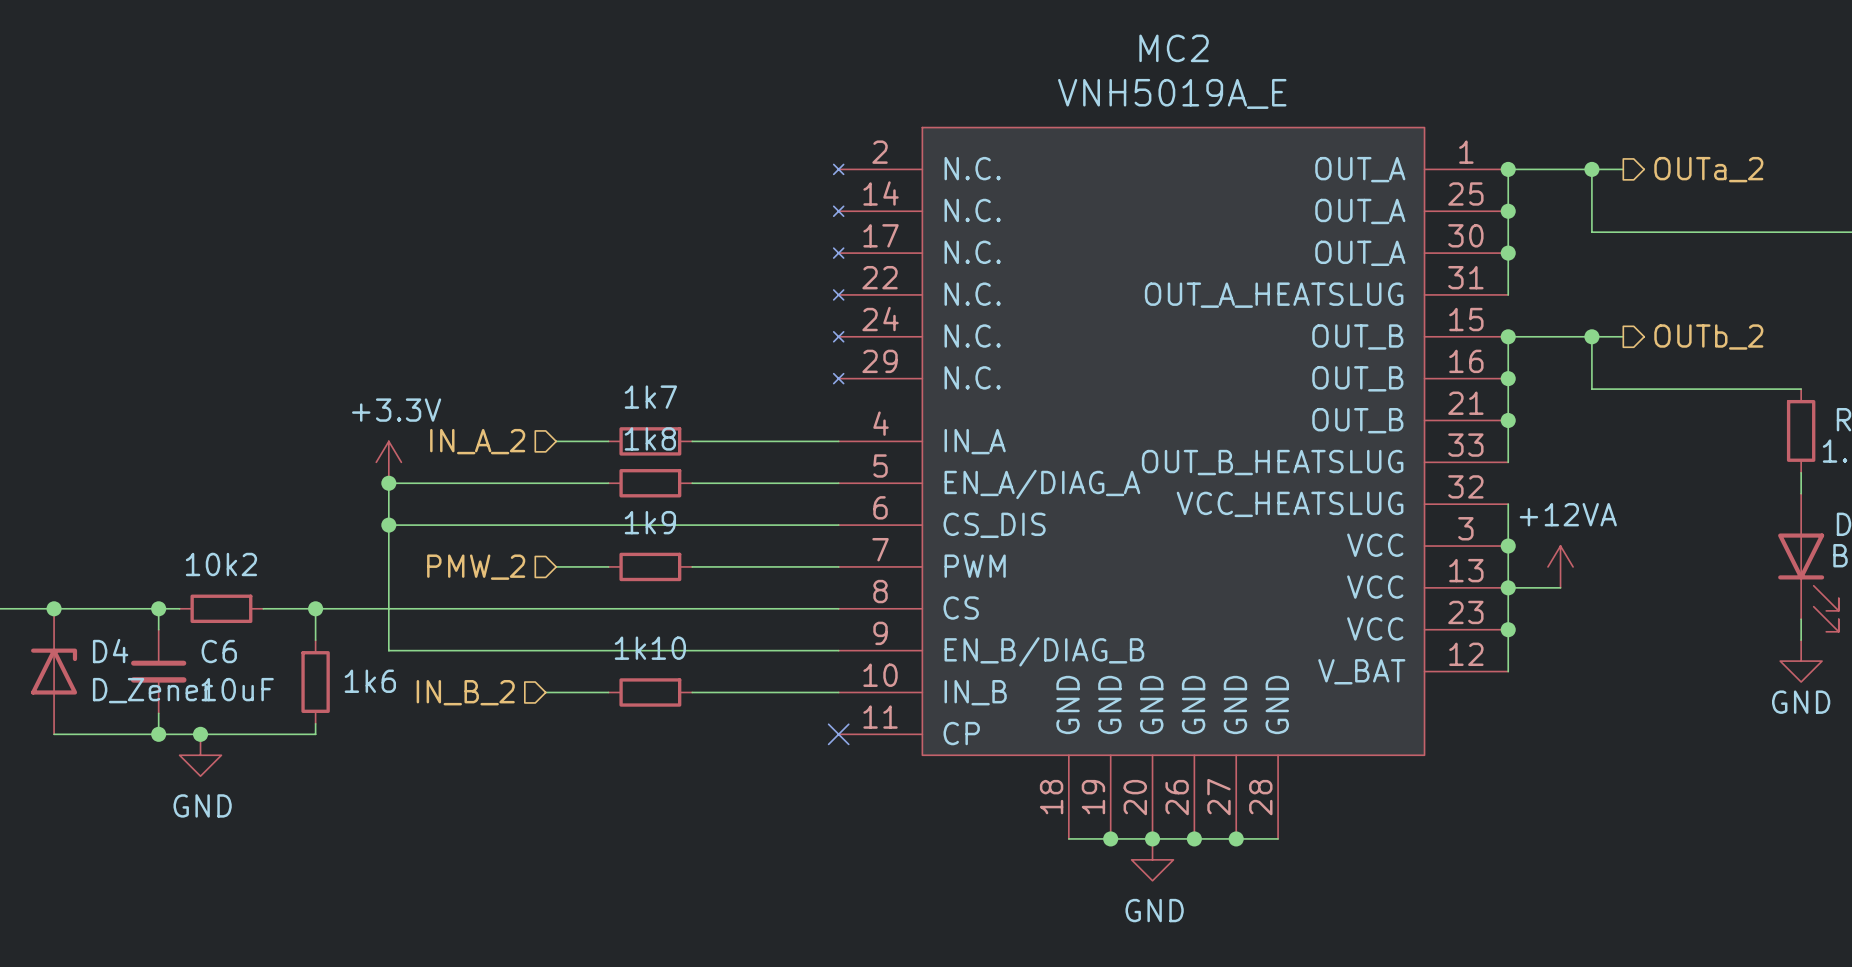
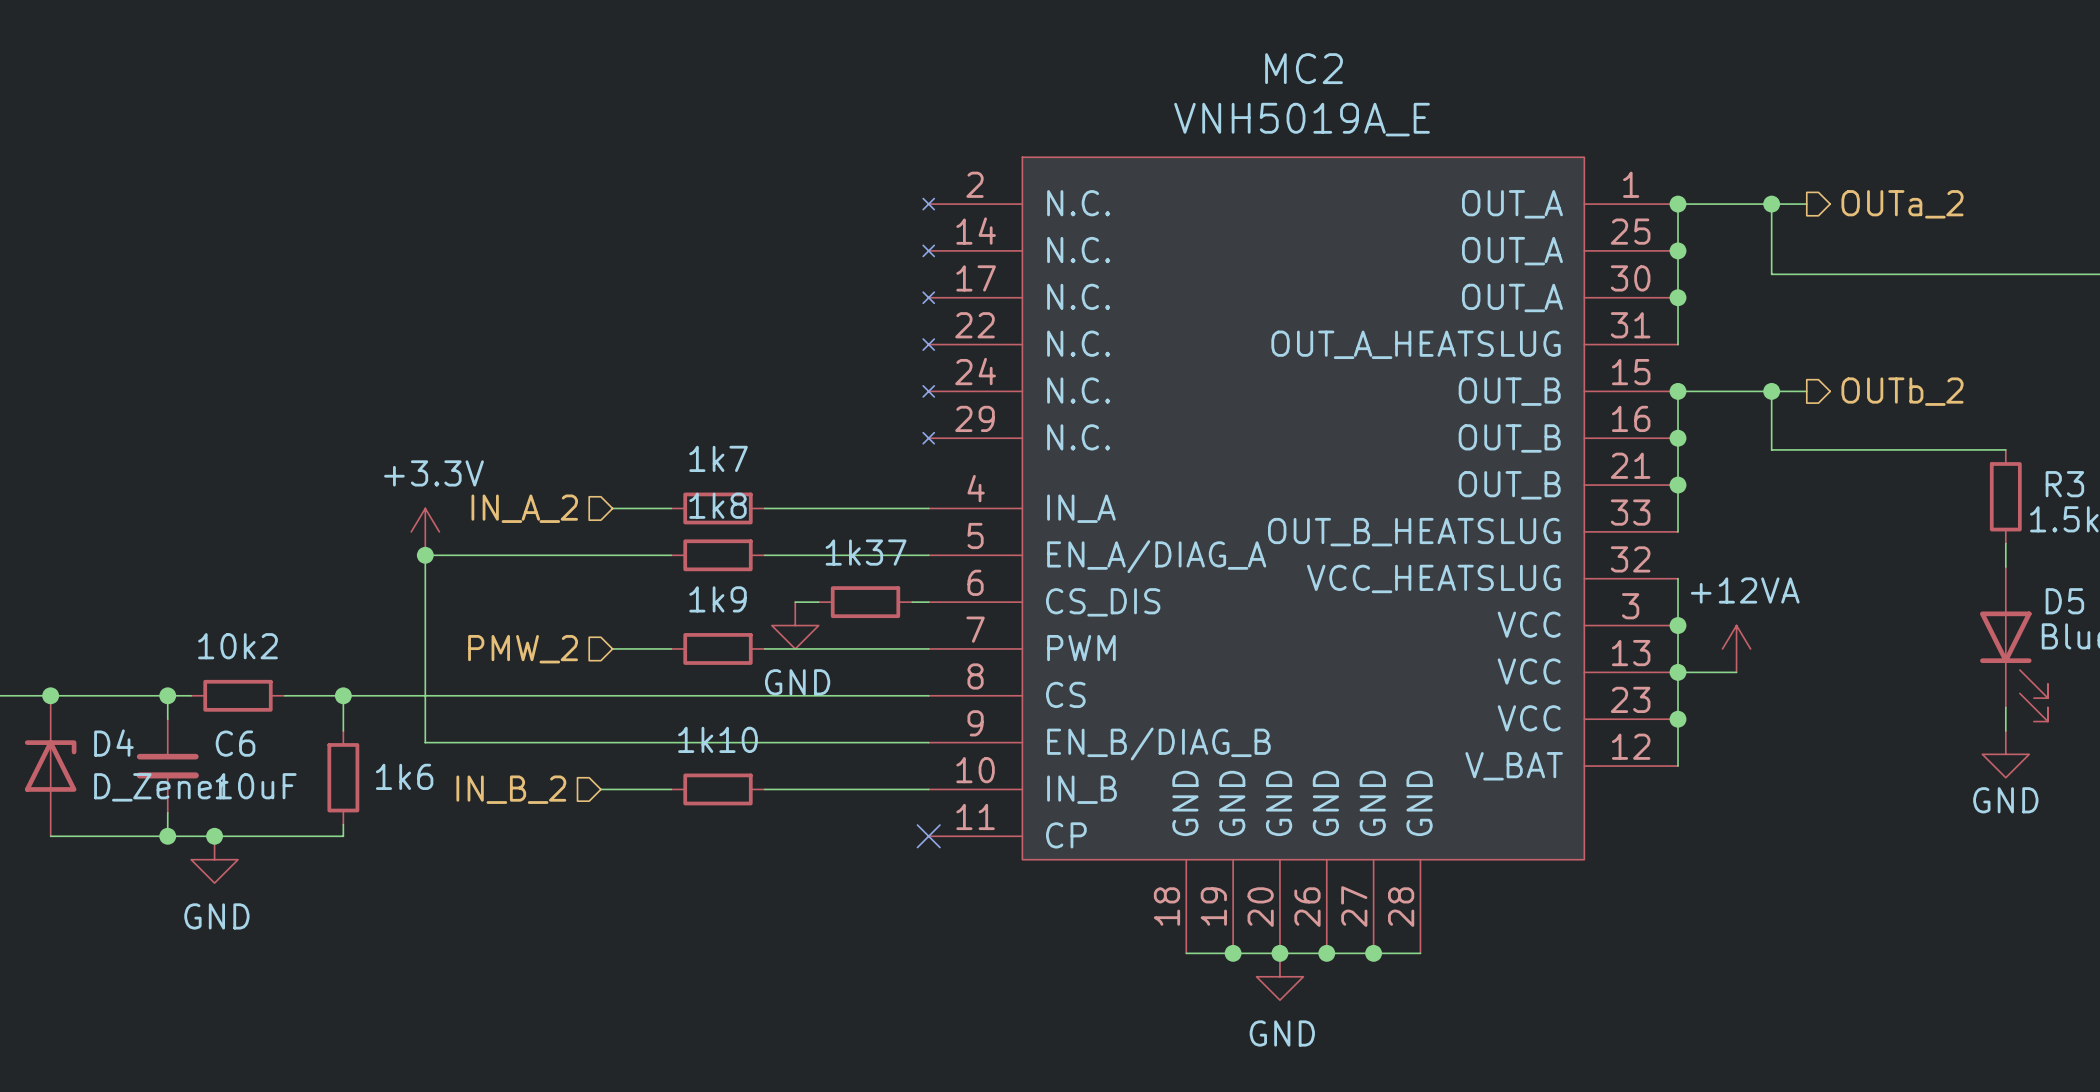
wire: (388, 525) (719, 525) -> none
junction: (388, 525) -> none
wire: (740, 525) (824, 525) -> none
1k37: none -> (865, 602)
power symbol: none -> GND (795, 625)

